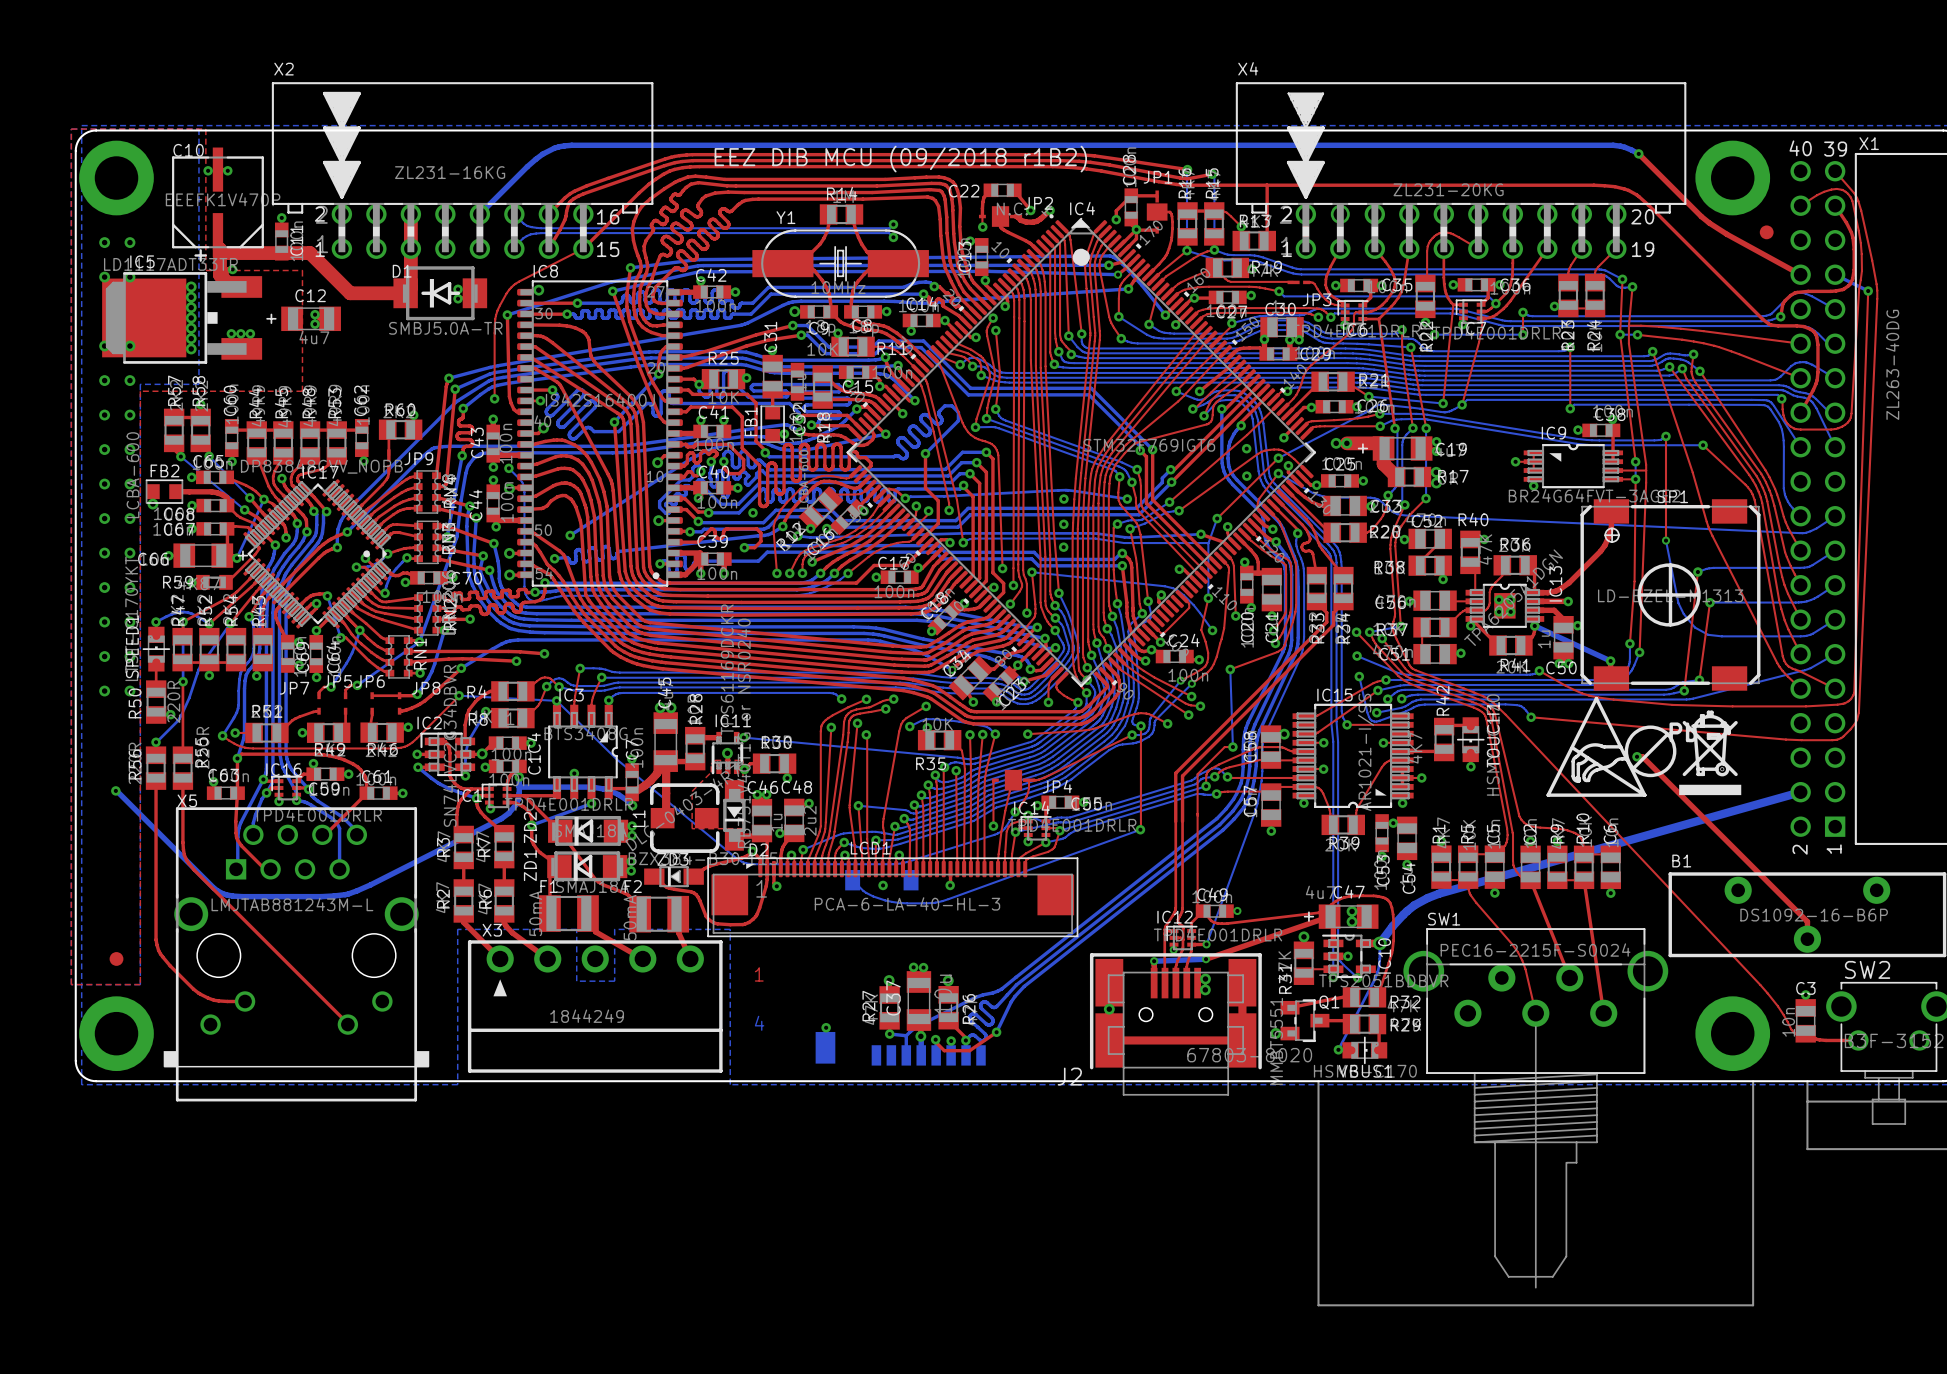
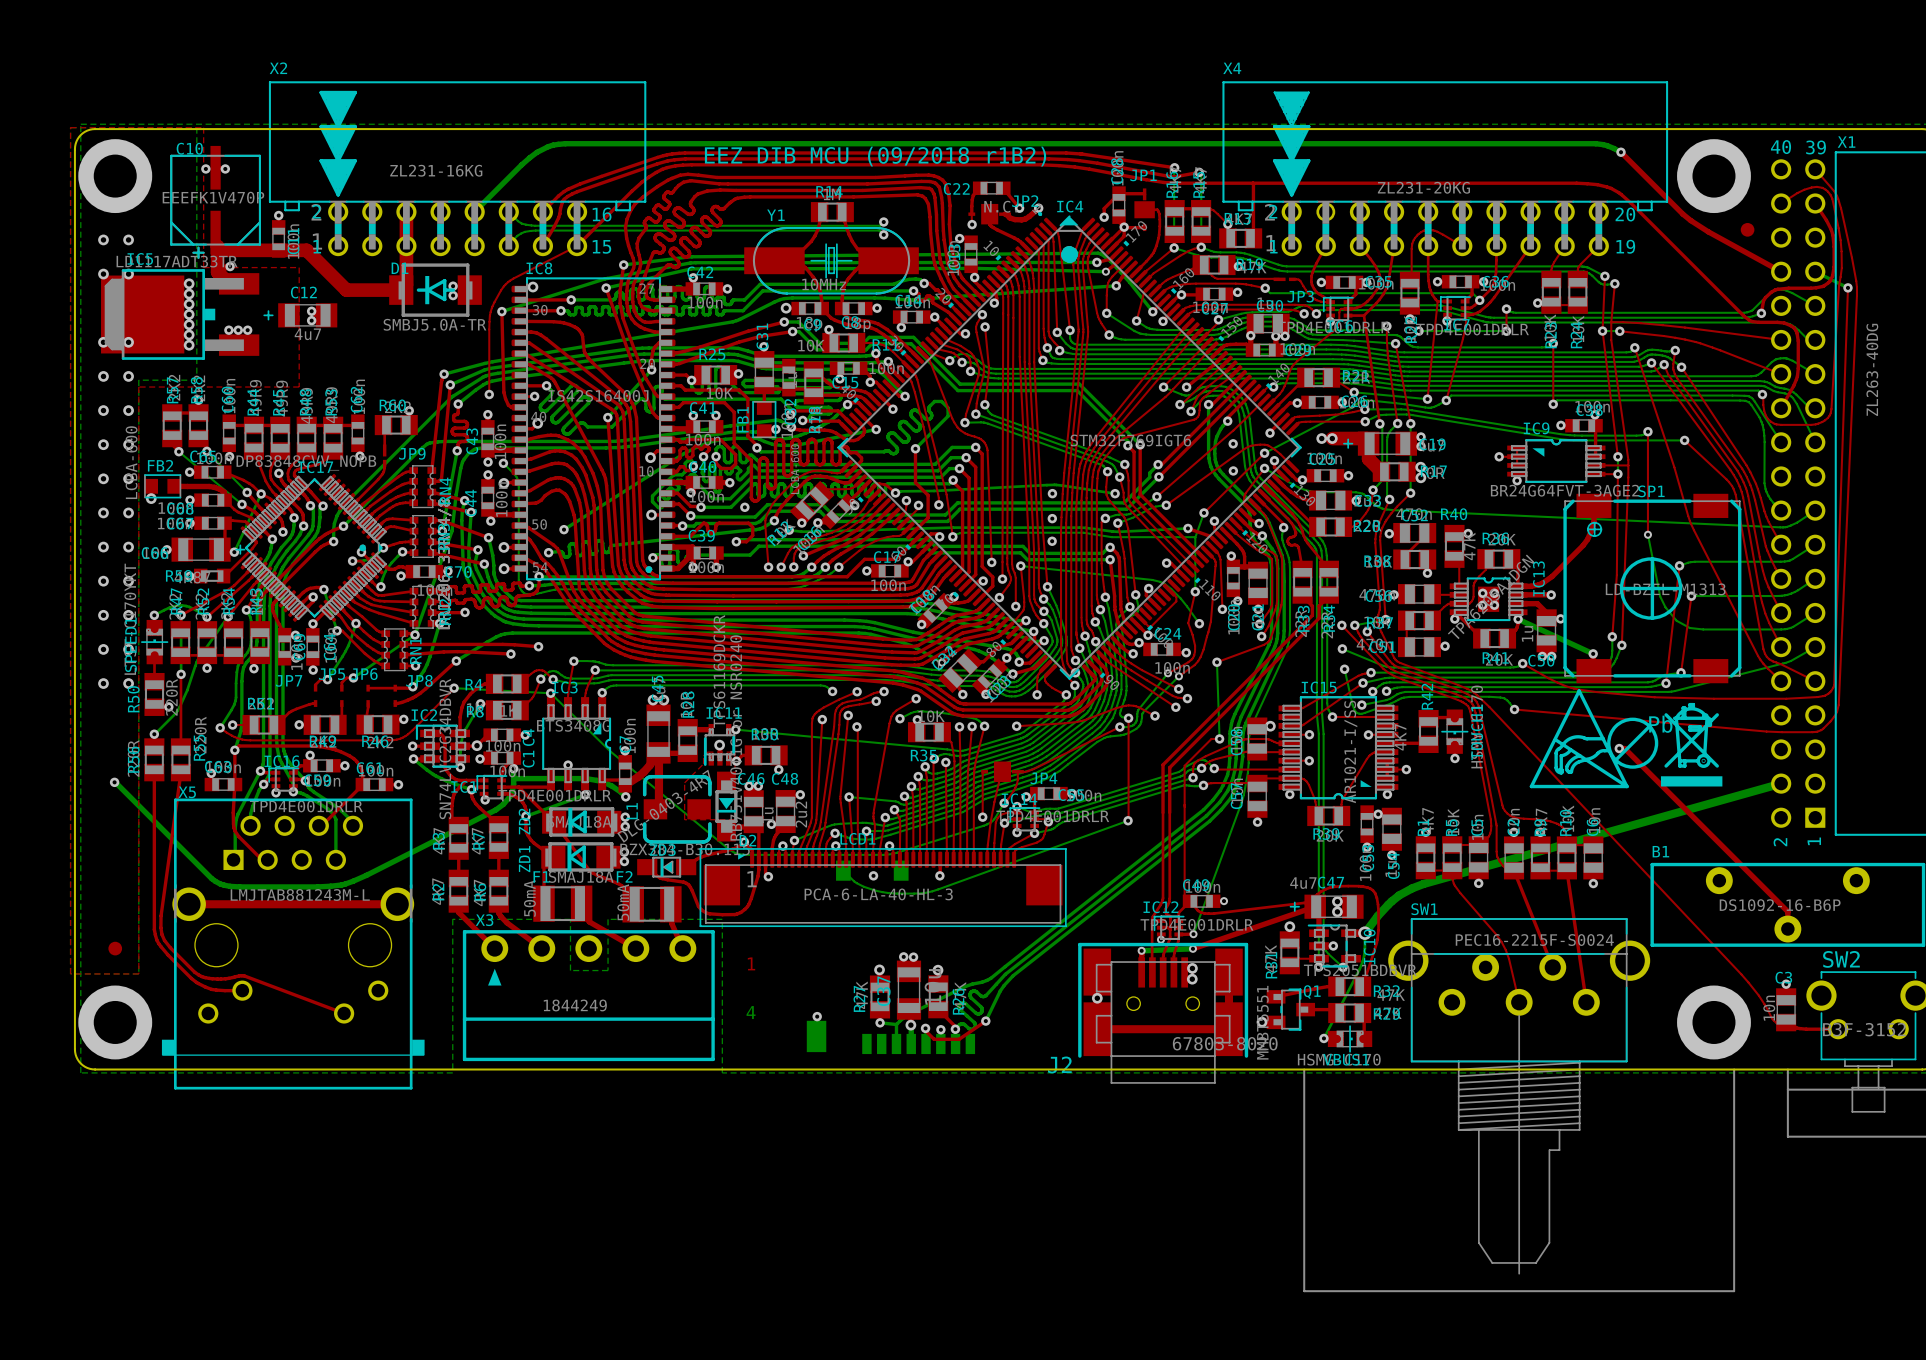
top track: (182, 781) (182, 842) (184, 855) (188, 863) (347, 1024) -> (180, 772) (161, 915) (160, 927) (164, 940) (194, 972) (202, 976) (220, 979) (244, 975) (344, 1013)
top track: none -> (189, 904) (397, 904)

